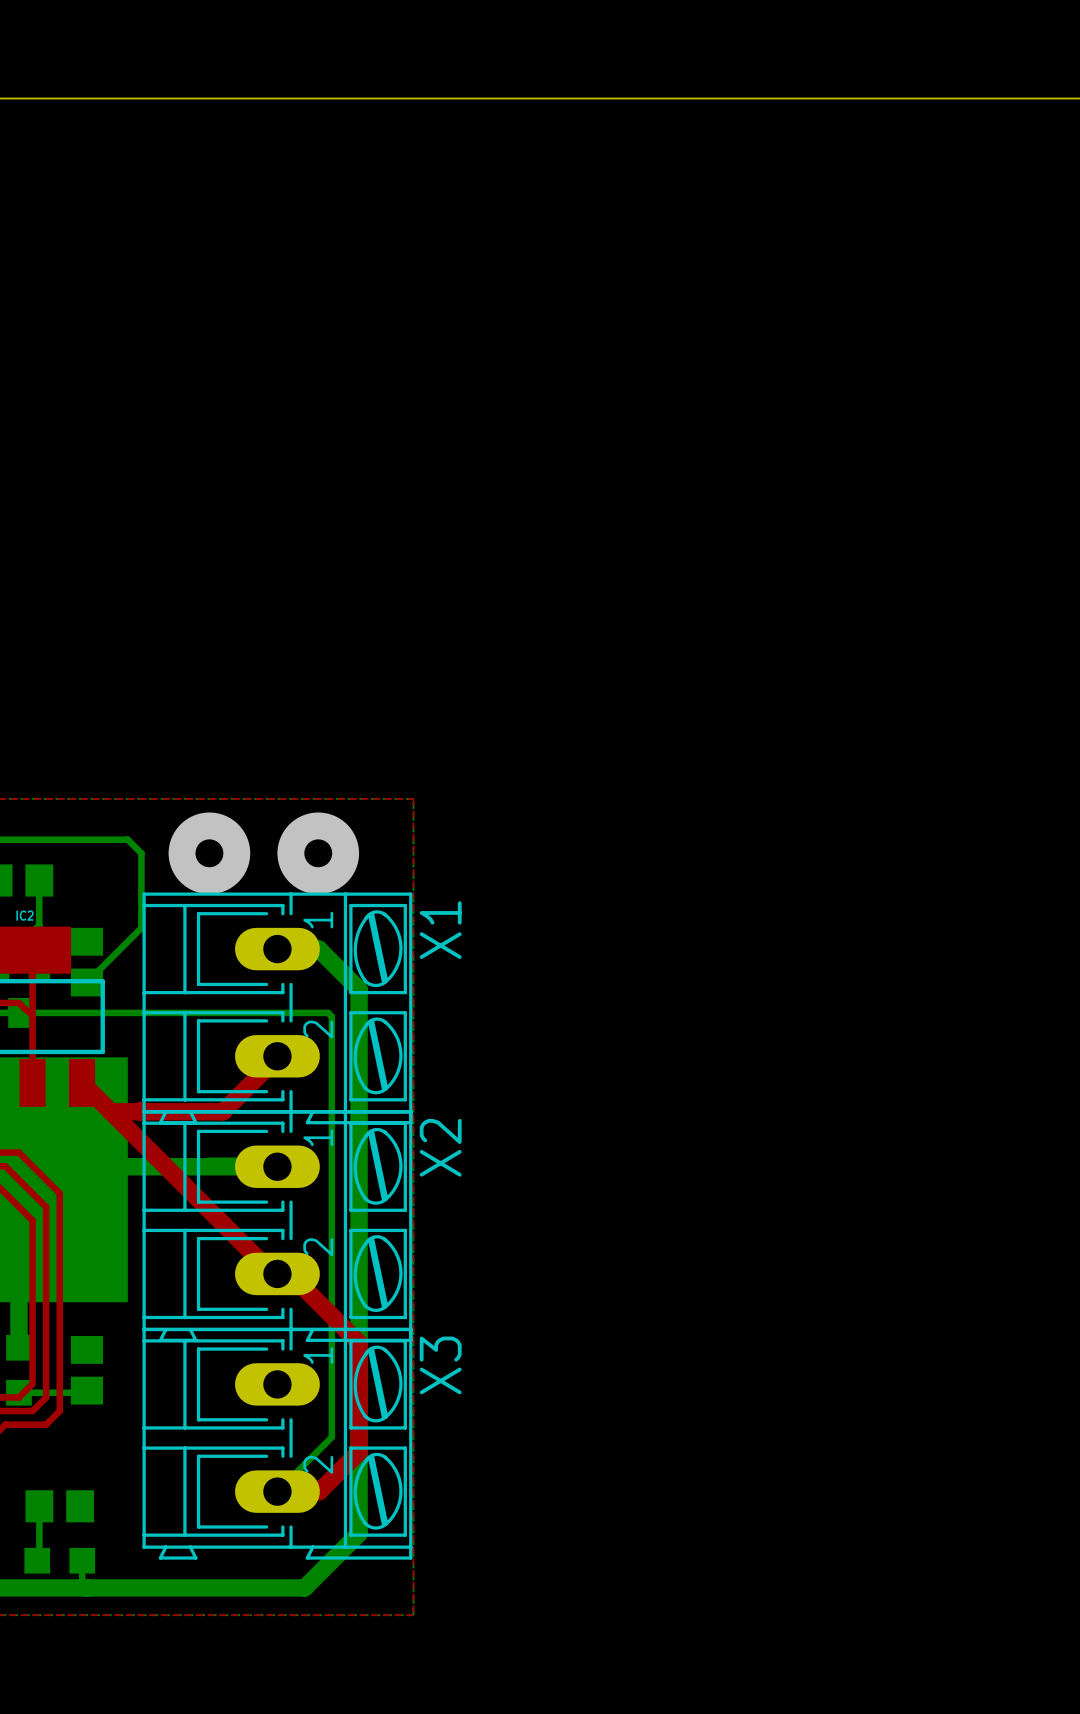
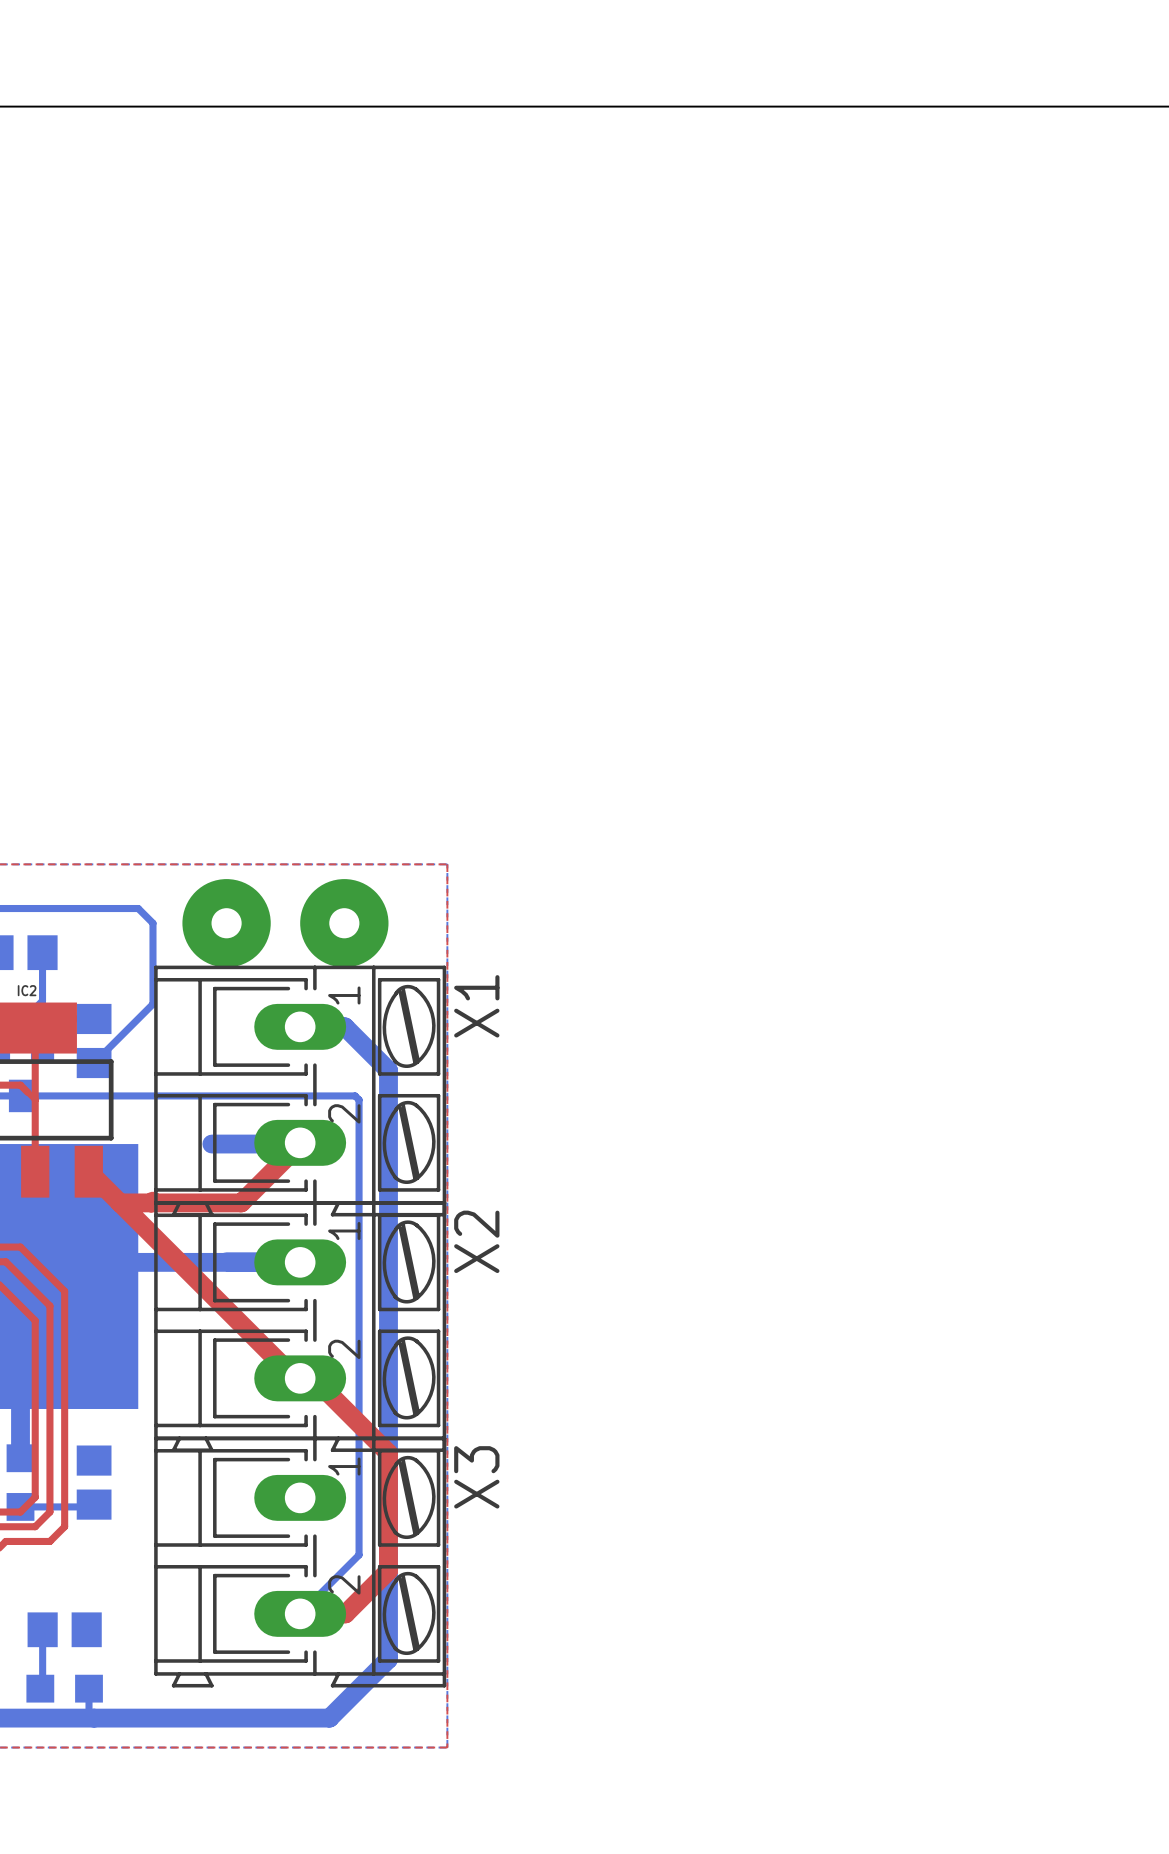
bottom track: none -> (211, 1144) (299, 1144)

